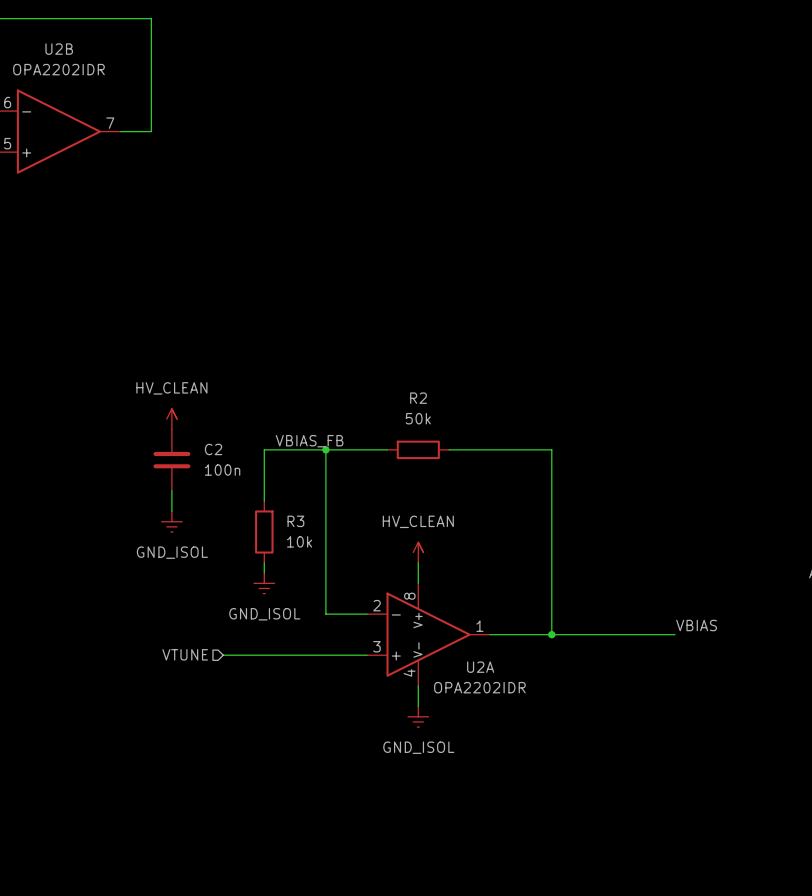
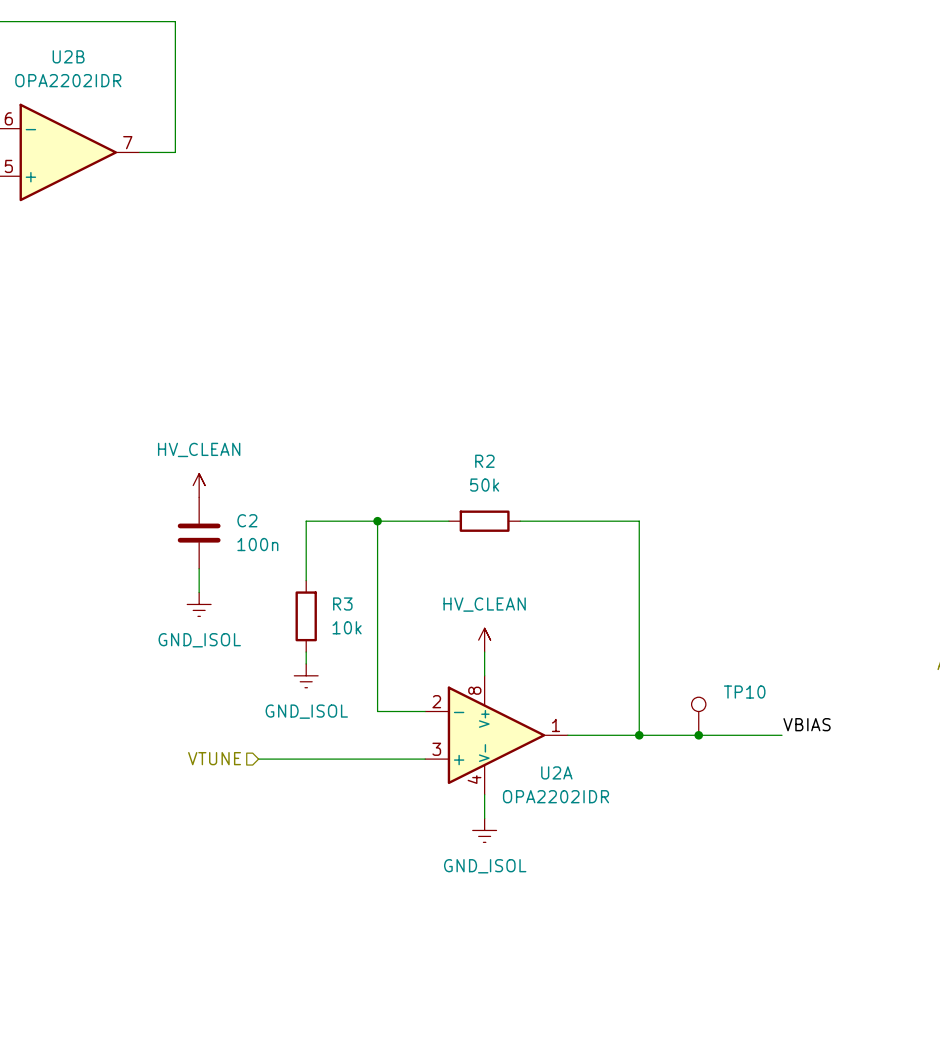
label: VBIAS_FB (309, 441) -> none
TP10: none -> (698, 716)
junction: none -> (698, 735)

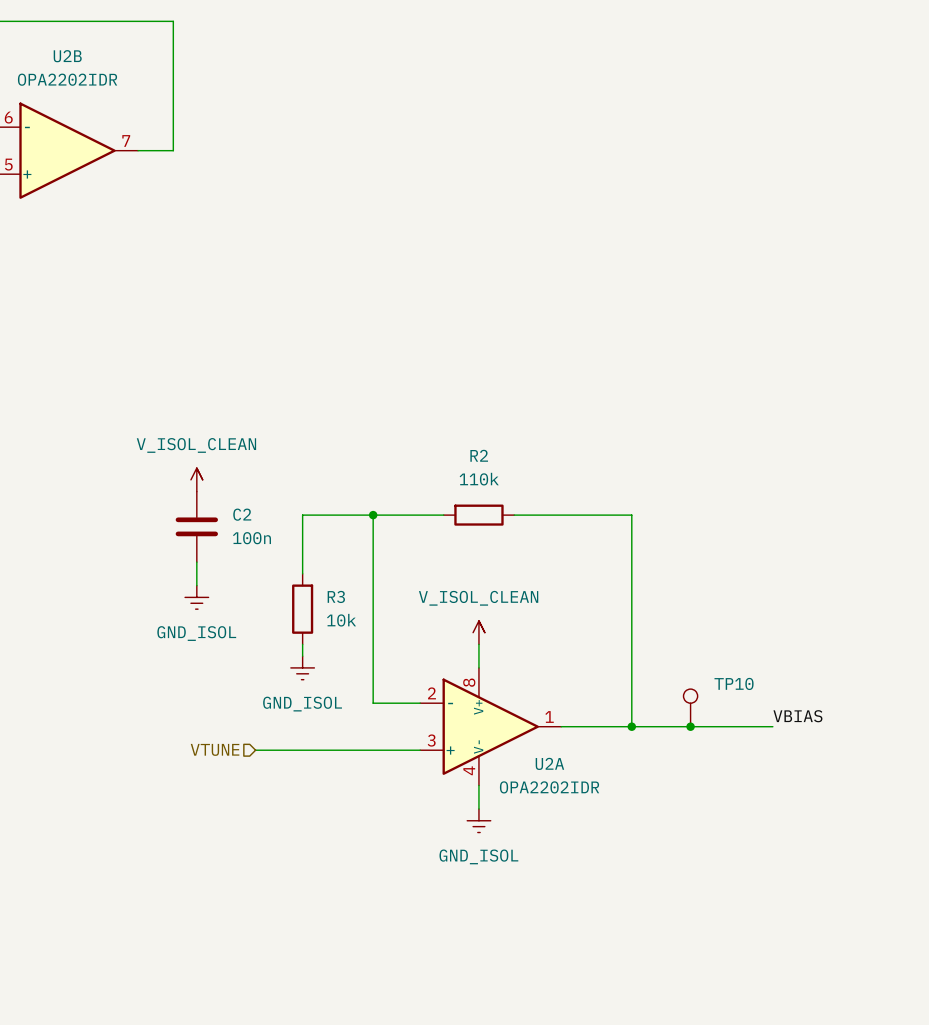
power symbol: HV_CLEAN (199, 485) -> V_ISOL_CLEAN (196, 479)
R2 value: 50k (484, 485) -> 110k (479, 479)
power symbol: HV_CLEAN (484, 640) -> V_ISOL_CLEAN (478, 632)

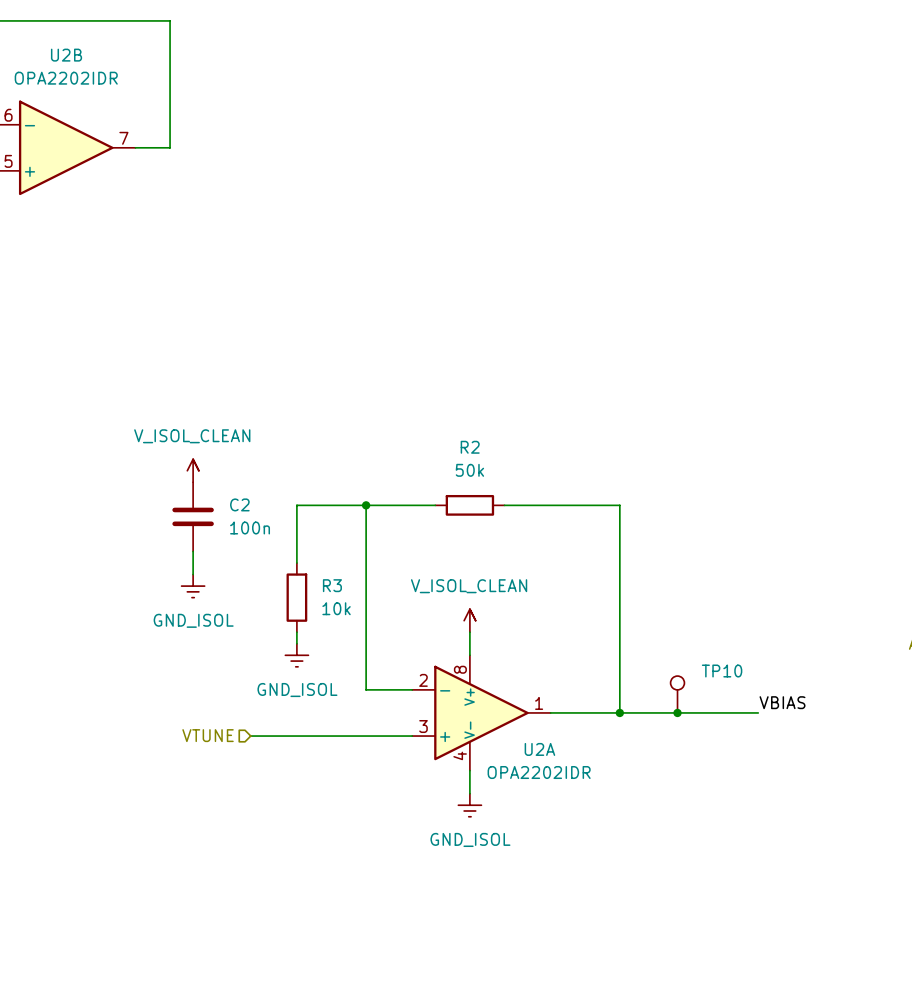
R2 value: 110k (479, 479) -> 50k (469, 470)

